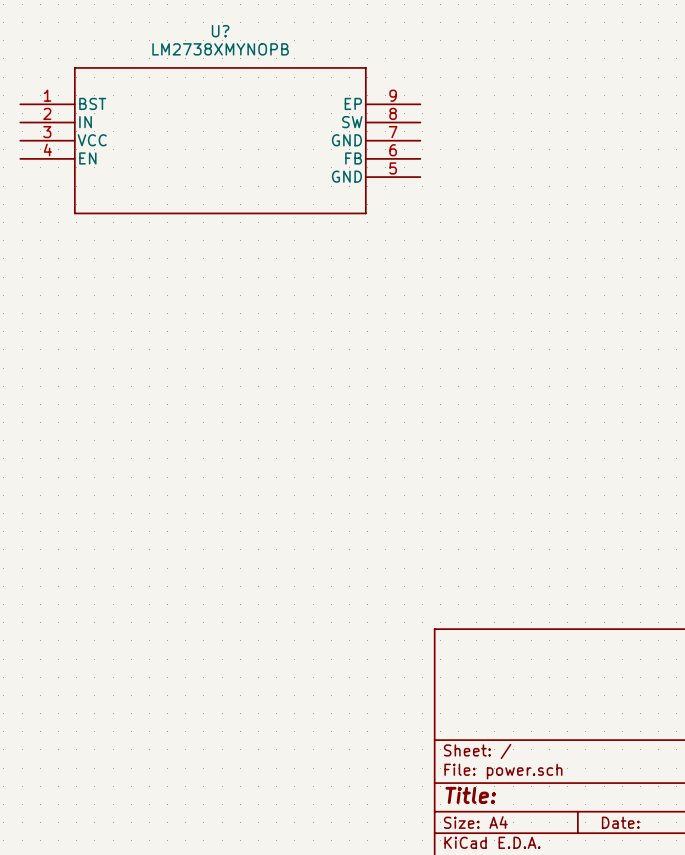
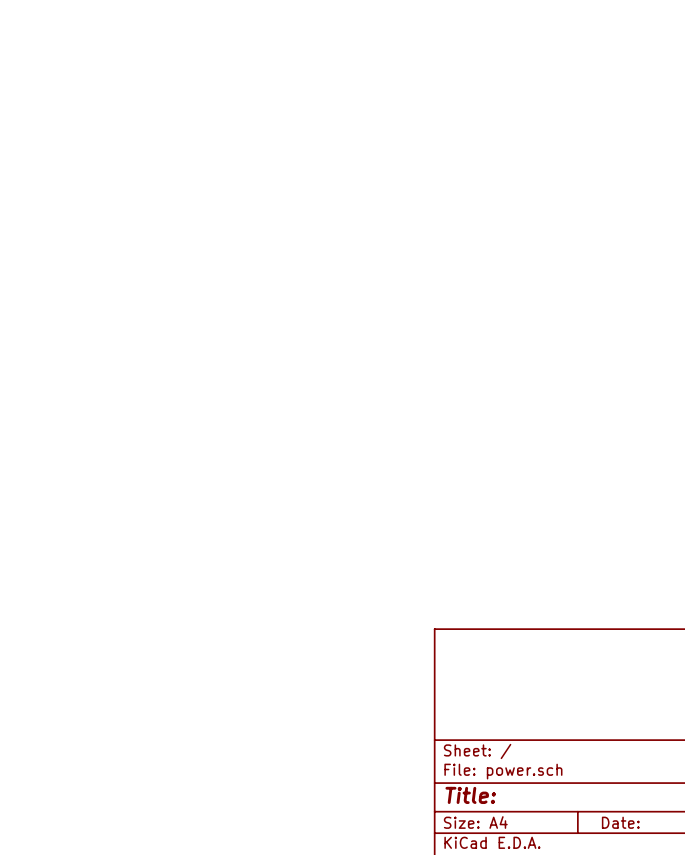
U?: LM2738XMYNOPB (220, 140) -> none

